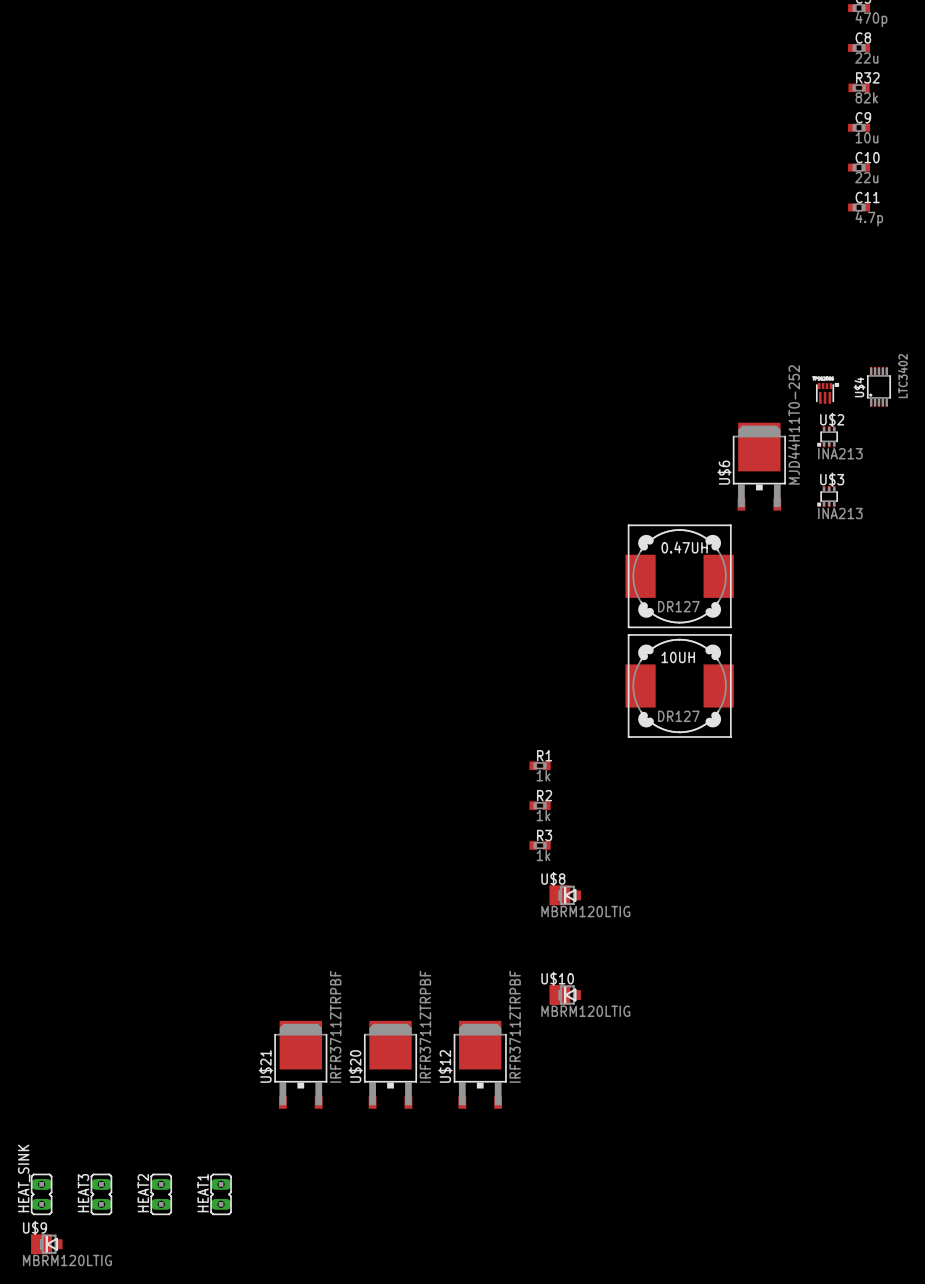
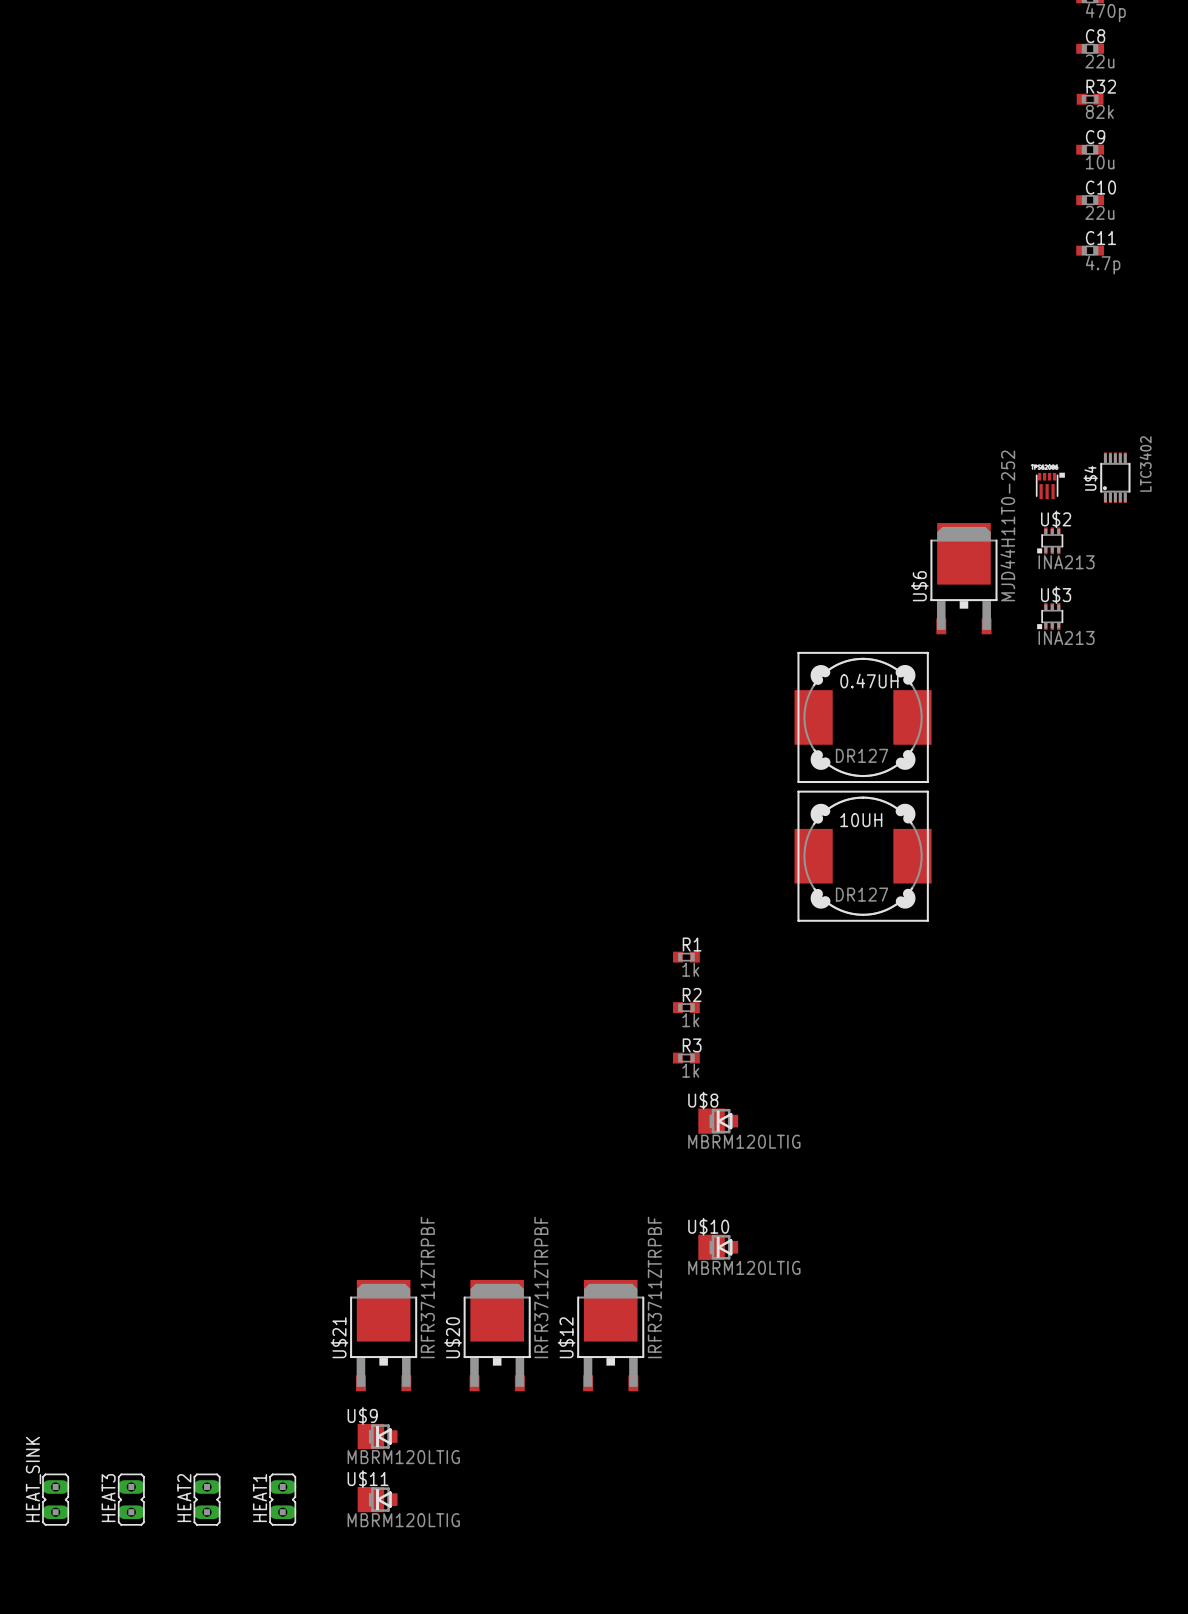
U$11: none -> MBRM120LTIG (377, 1499)
U$9 position: (46, 1244) -> (377, 1436)

